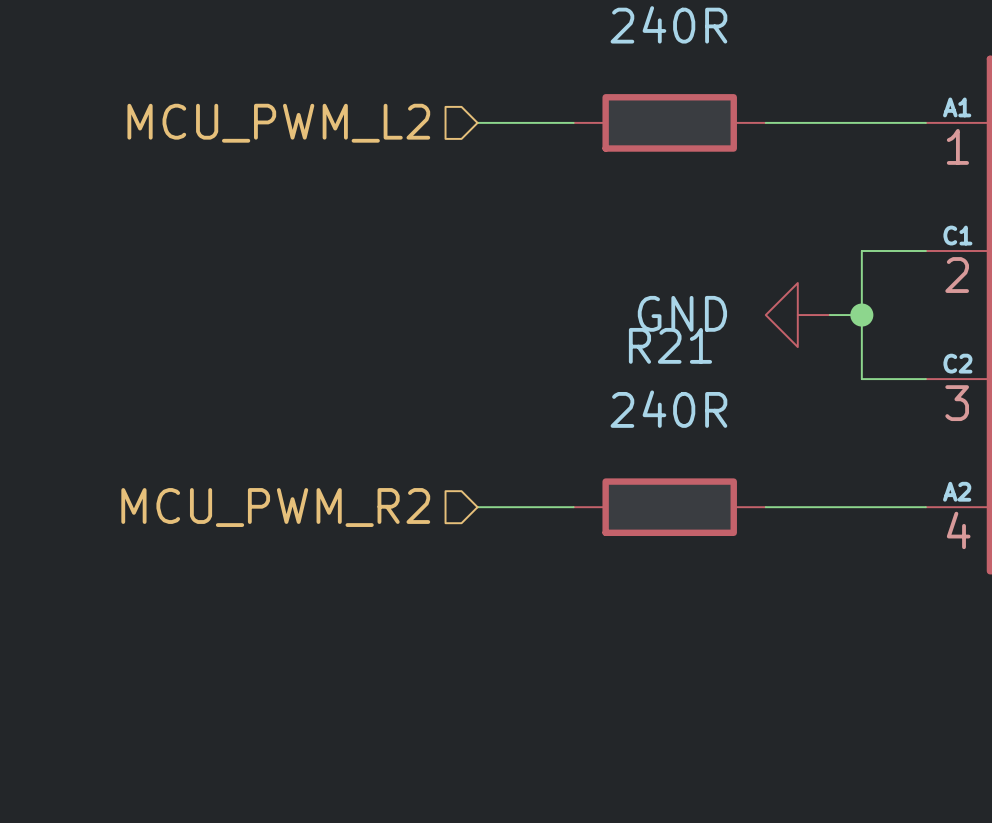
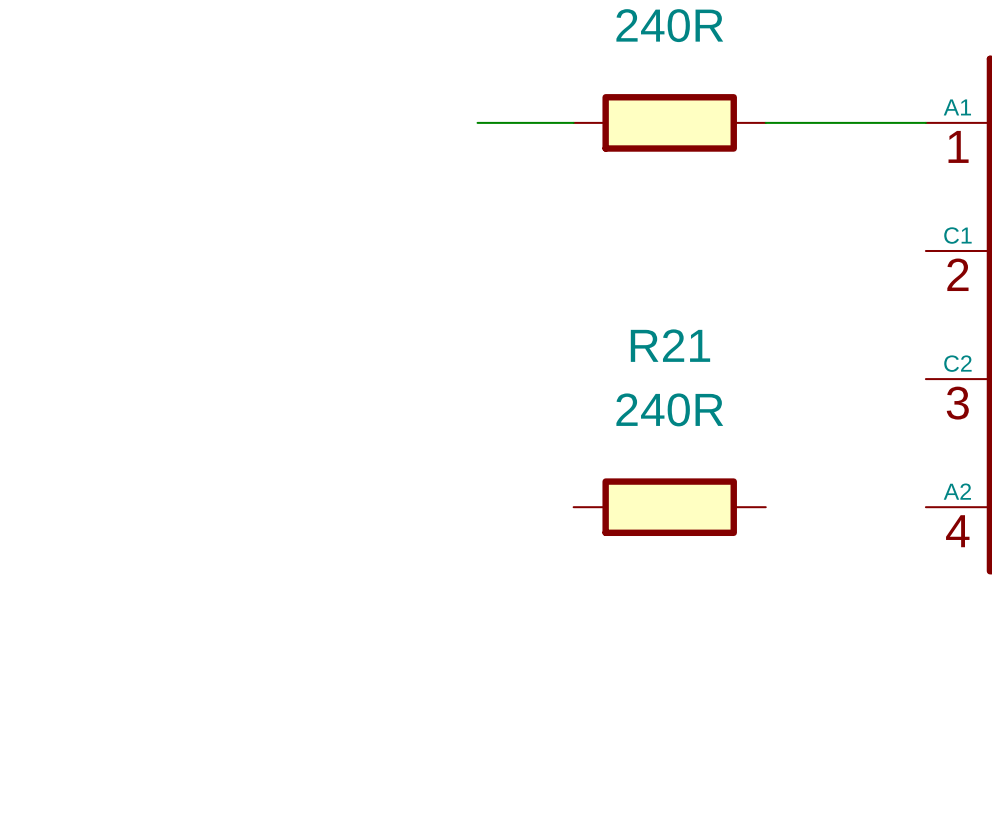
hierarchical label: MCU_PWM_L2 (278, 123) -> none
wire: (925, 250) (861, 250) (861, 379) (925, 379) -> none
power symbol: GND (797, 315) -> none
wire: (829, 315) (861, 315) -> none
junction: (861, 315) -> none
hierarchical label: MCU_PWM_R2 (275, 507) -> none
wire: (477, 507) (573, 507) -> none
wire: (765, 507) (925, 507) -> none

